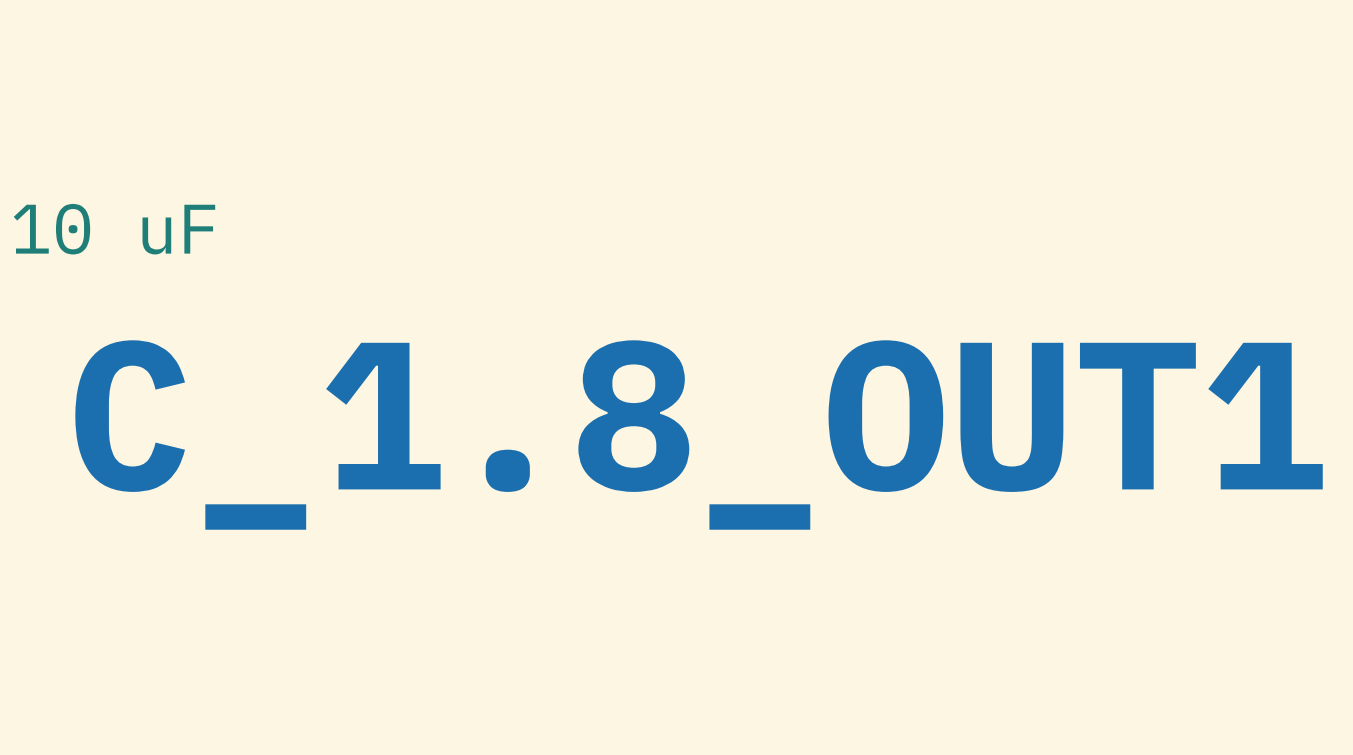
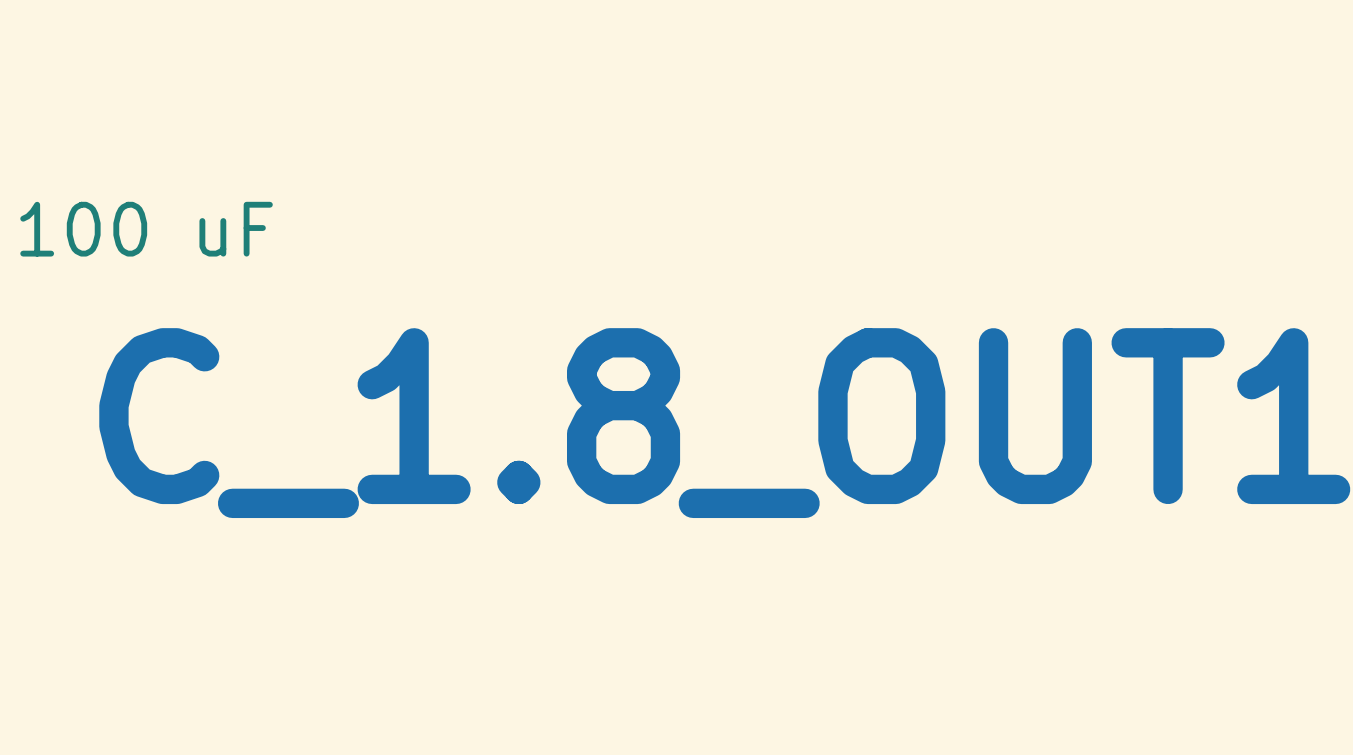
C_1.8_OUT1 value: 10 uF (114, 229) -> 100 uF (146, 229)

